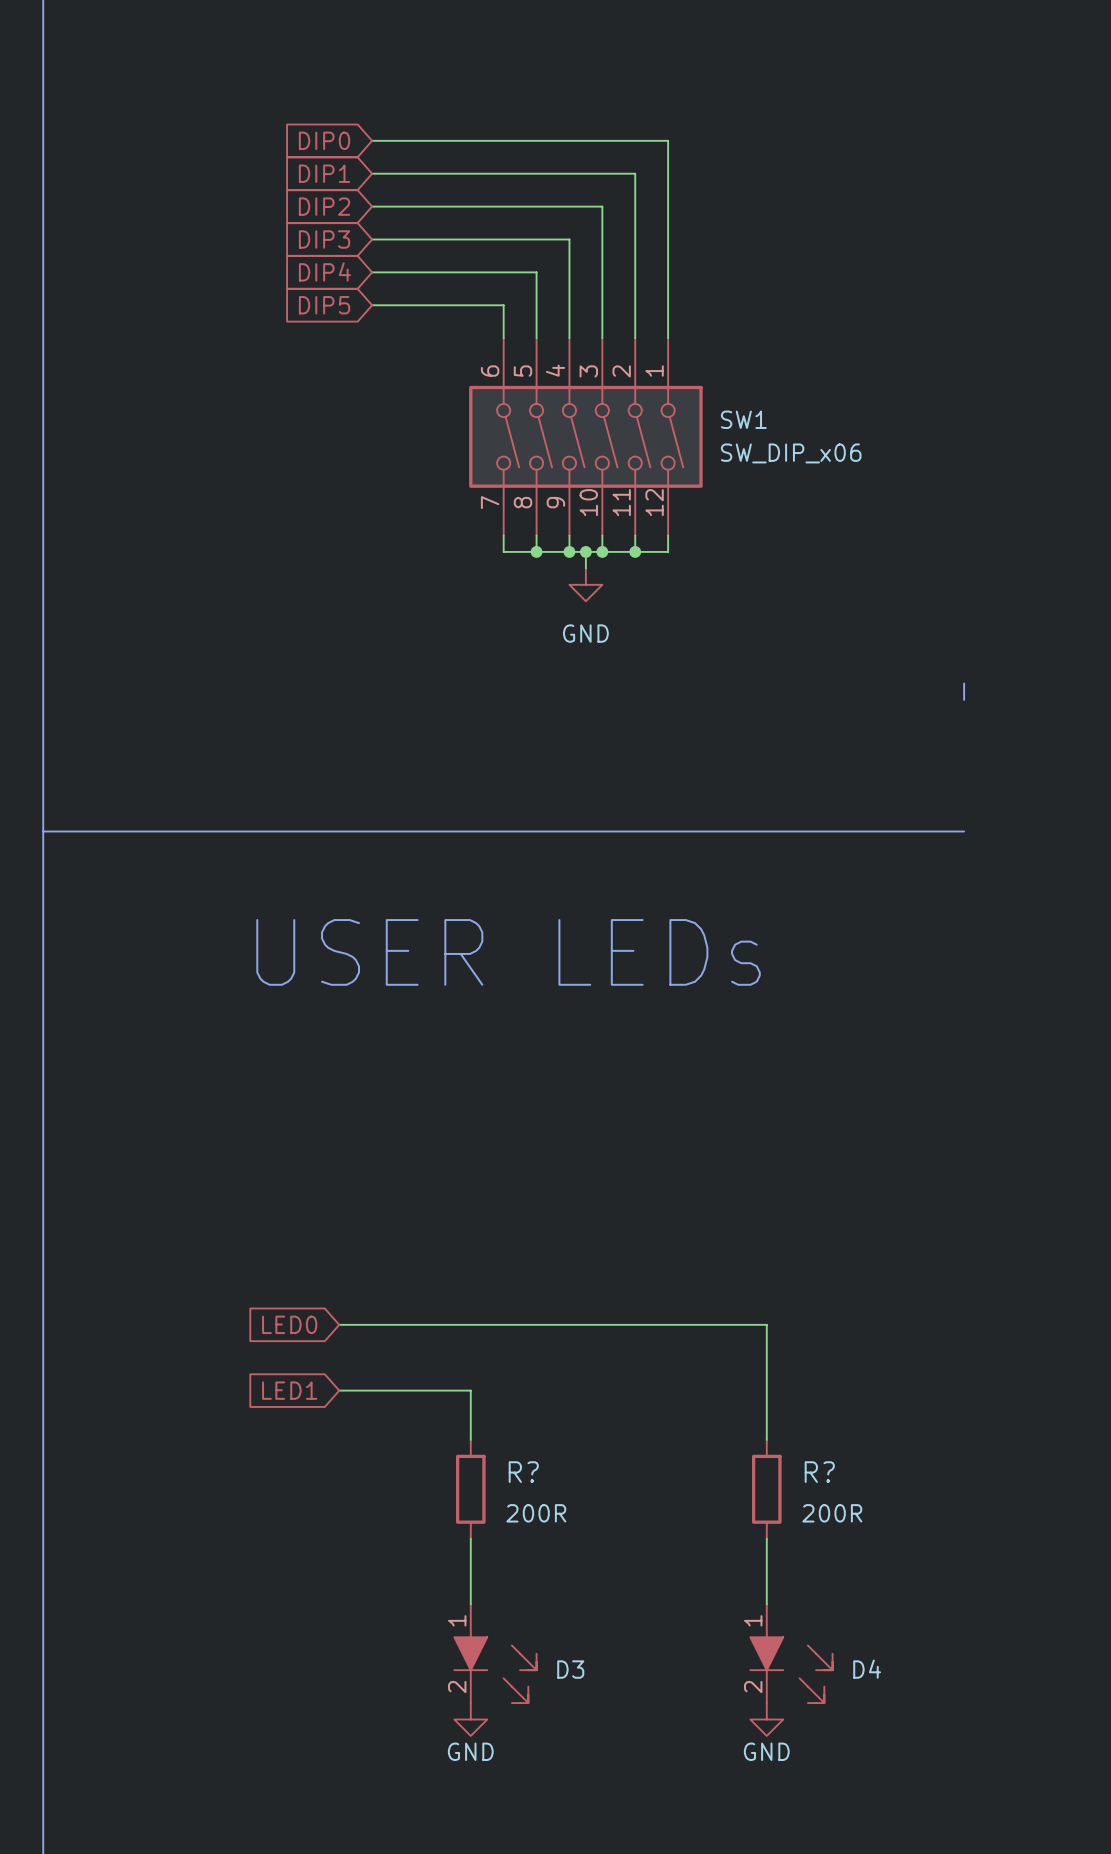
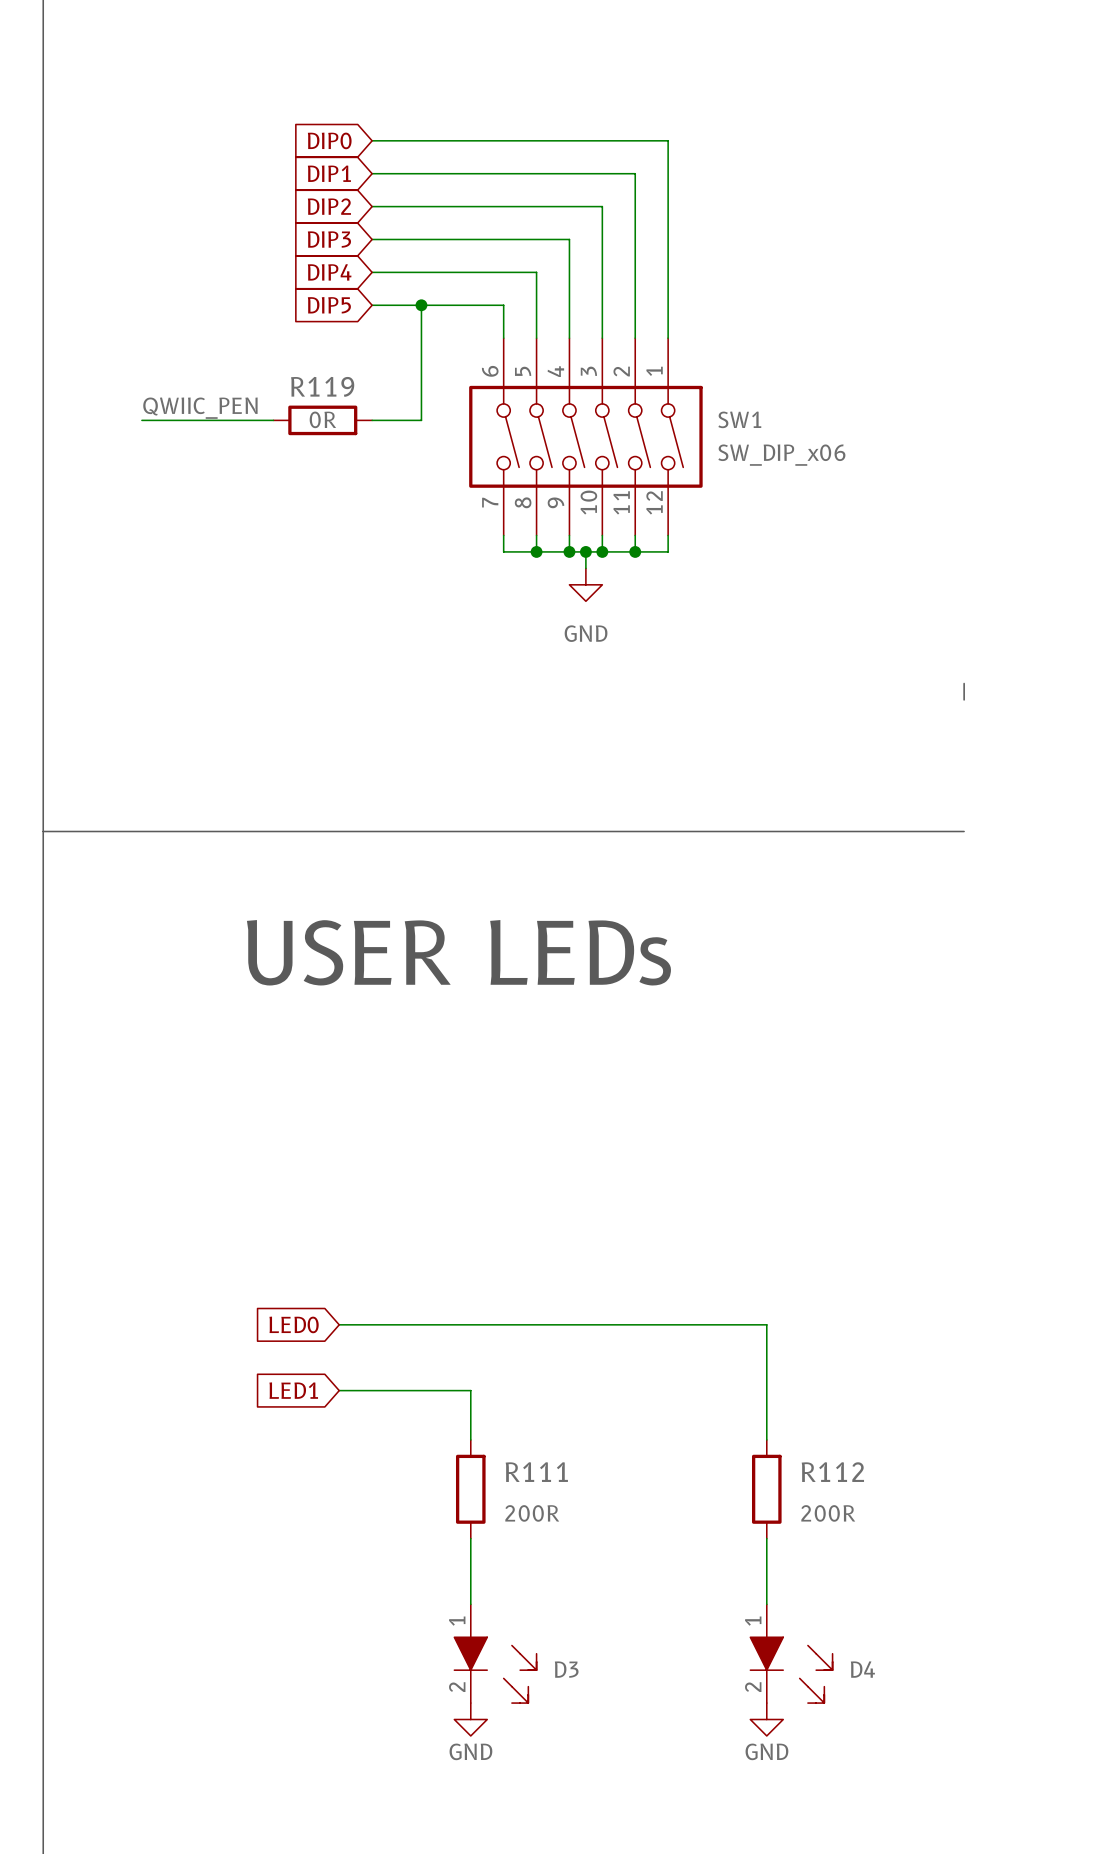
wire: none -> (421, 305) (421, 420) (372, 420)
junction: none -> (421, 305)
label: none -> QWIIC_PEN (200, 408)
wire: none -> (141, 420) (273, 420)
R119: none -> (322, 420)
R? name: R? (523, 1472) -> R111 (536, 1472)
R? name: R? (819, 1472) -> R112 (832, 1472)

